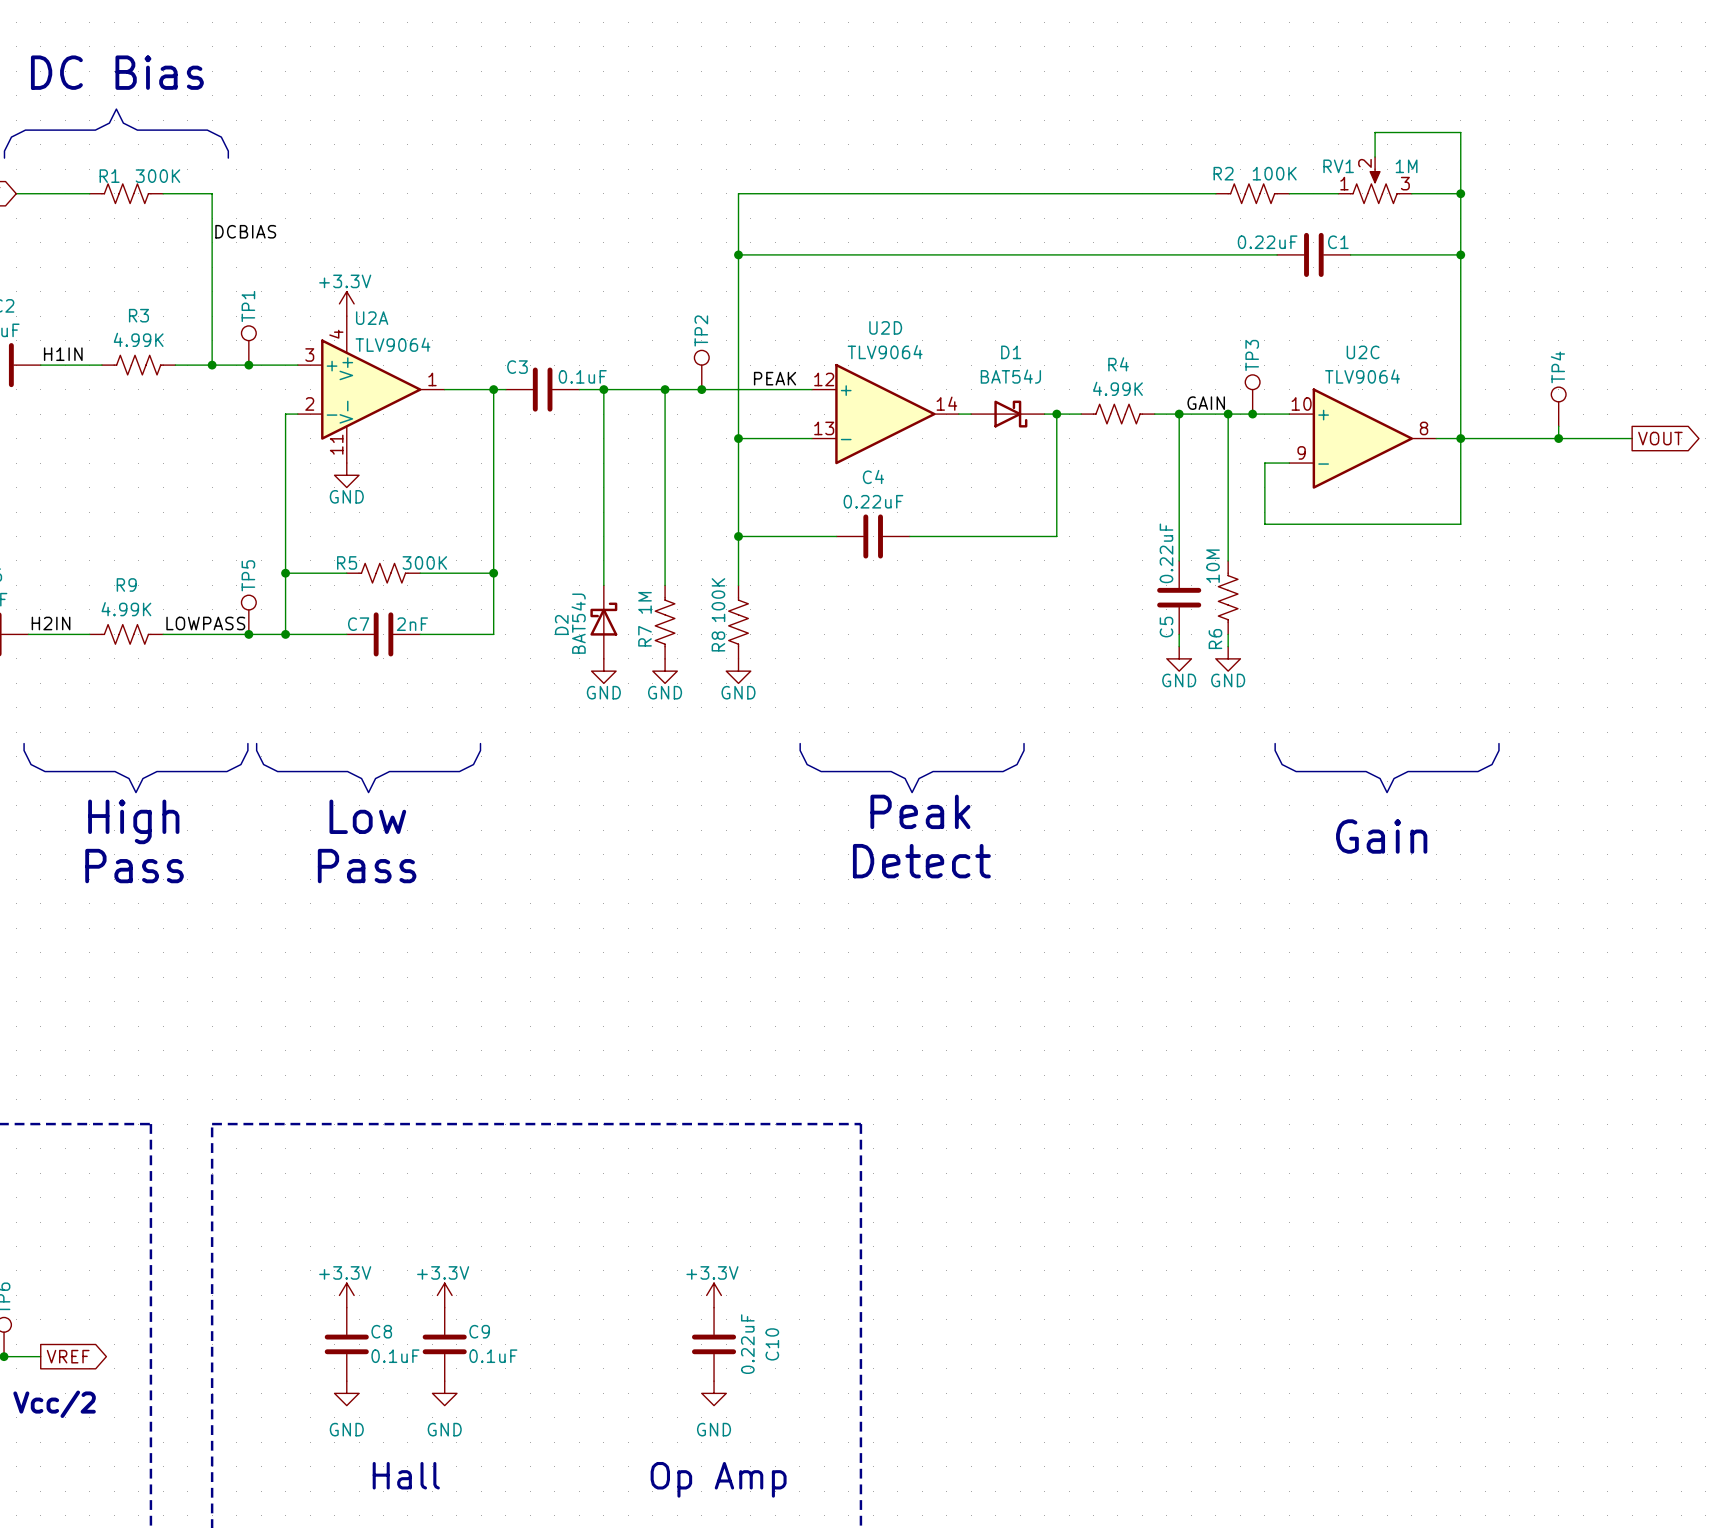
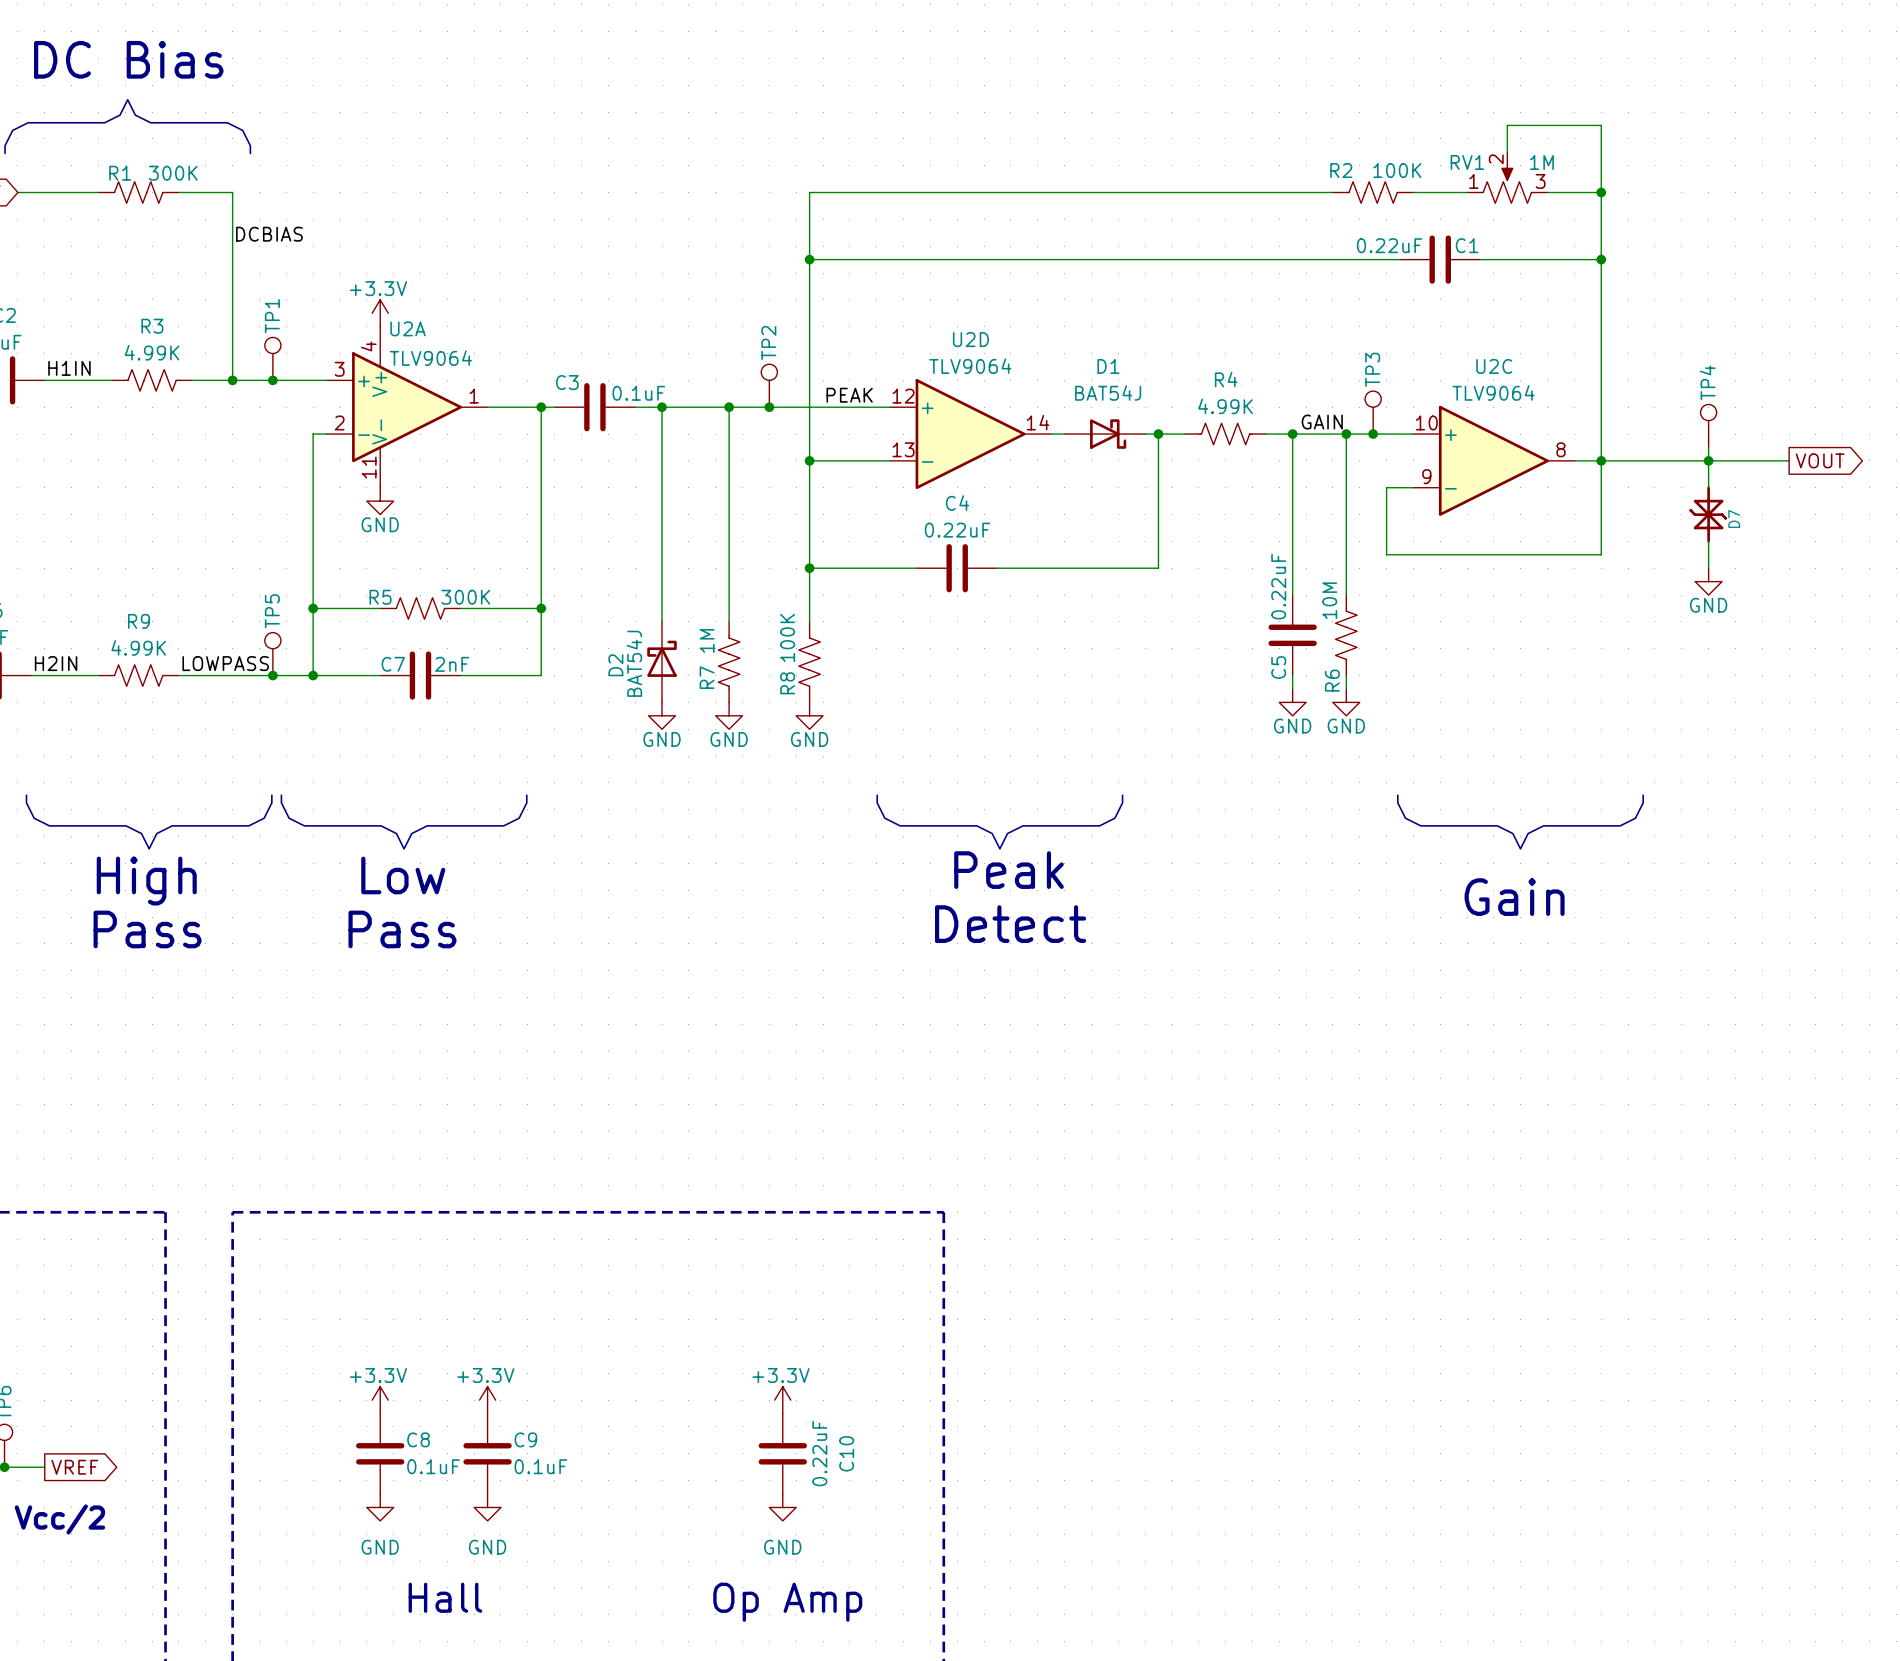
wire: none -> (1708, 460) (1708, 487)
D7: none -> (1708, 514)
wire: none -> (1708, 541) (1708, 568)
power symbol: none -> GND (1708, 581)

